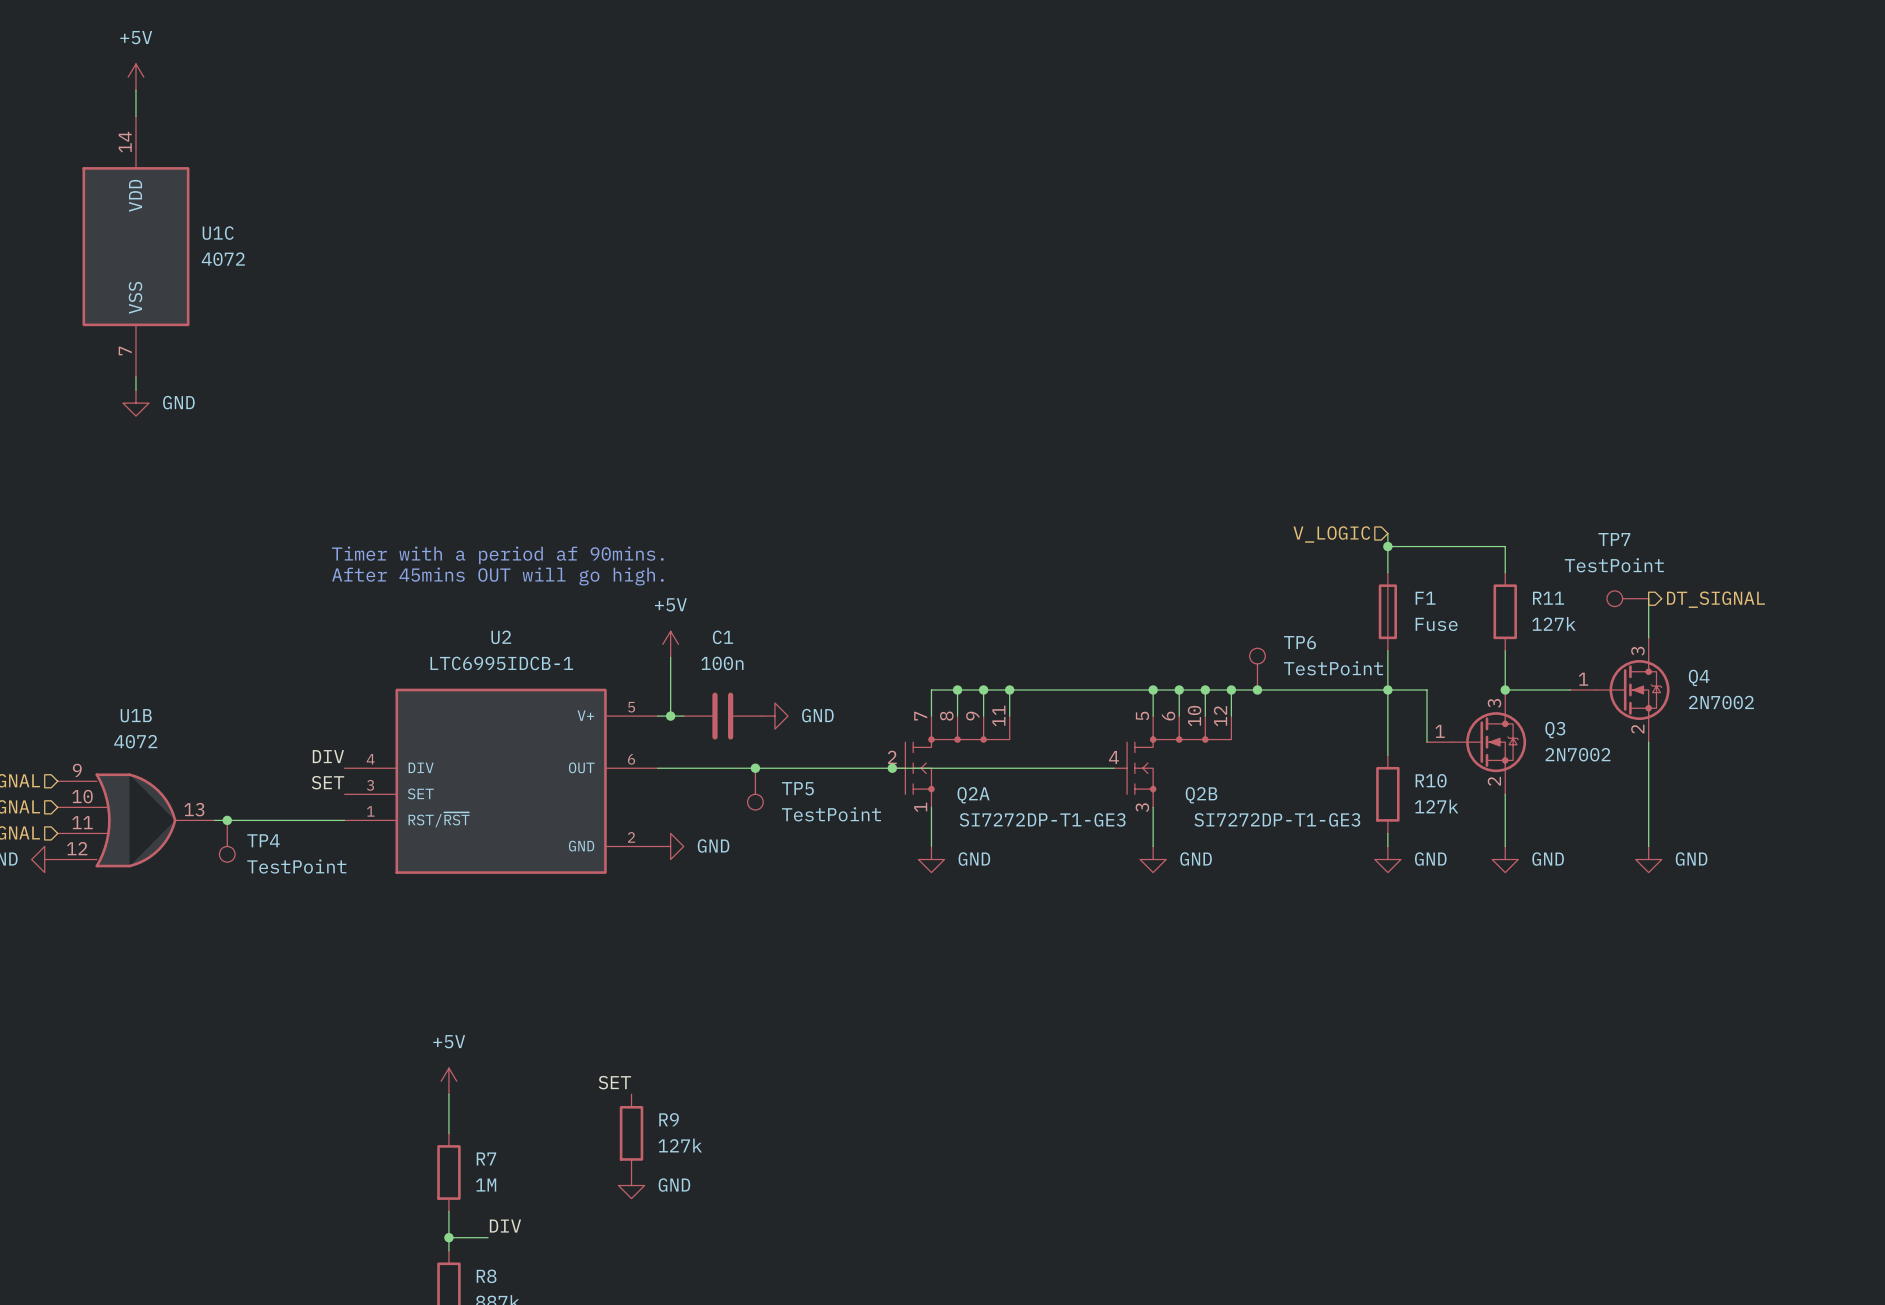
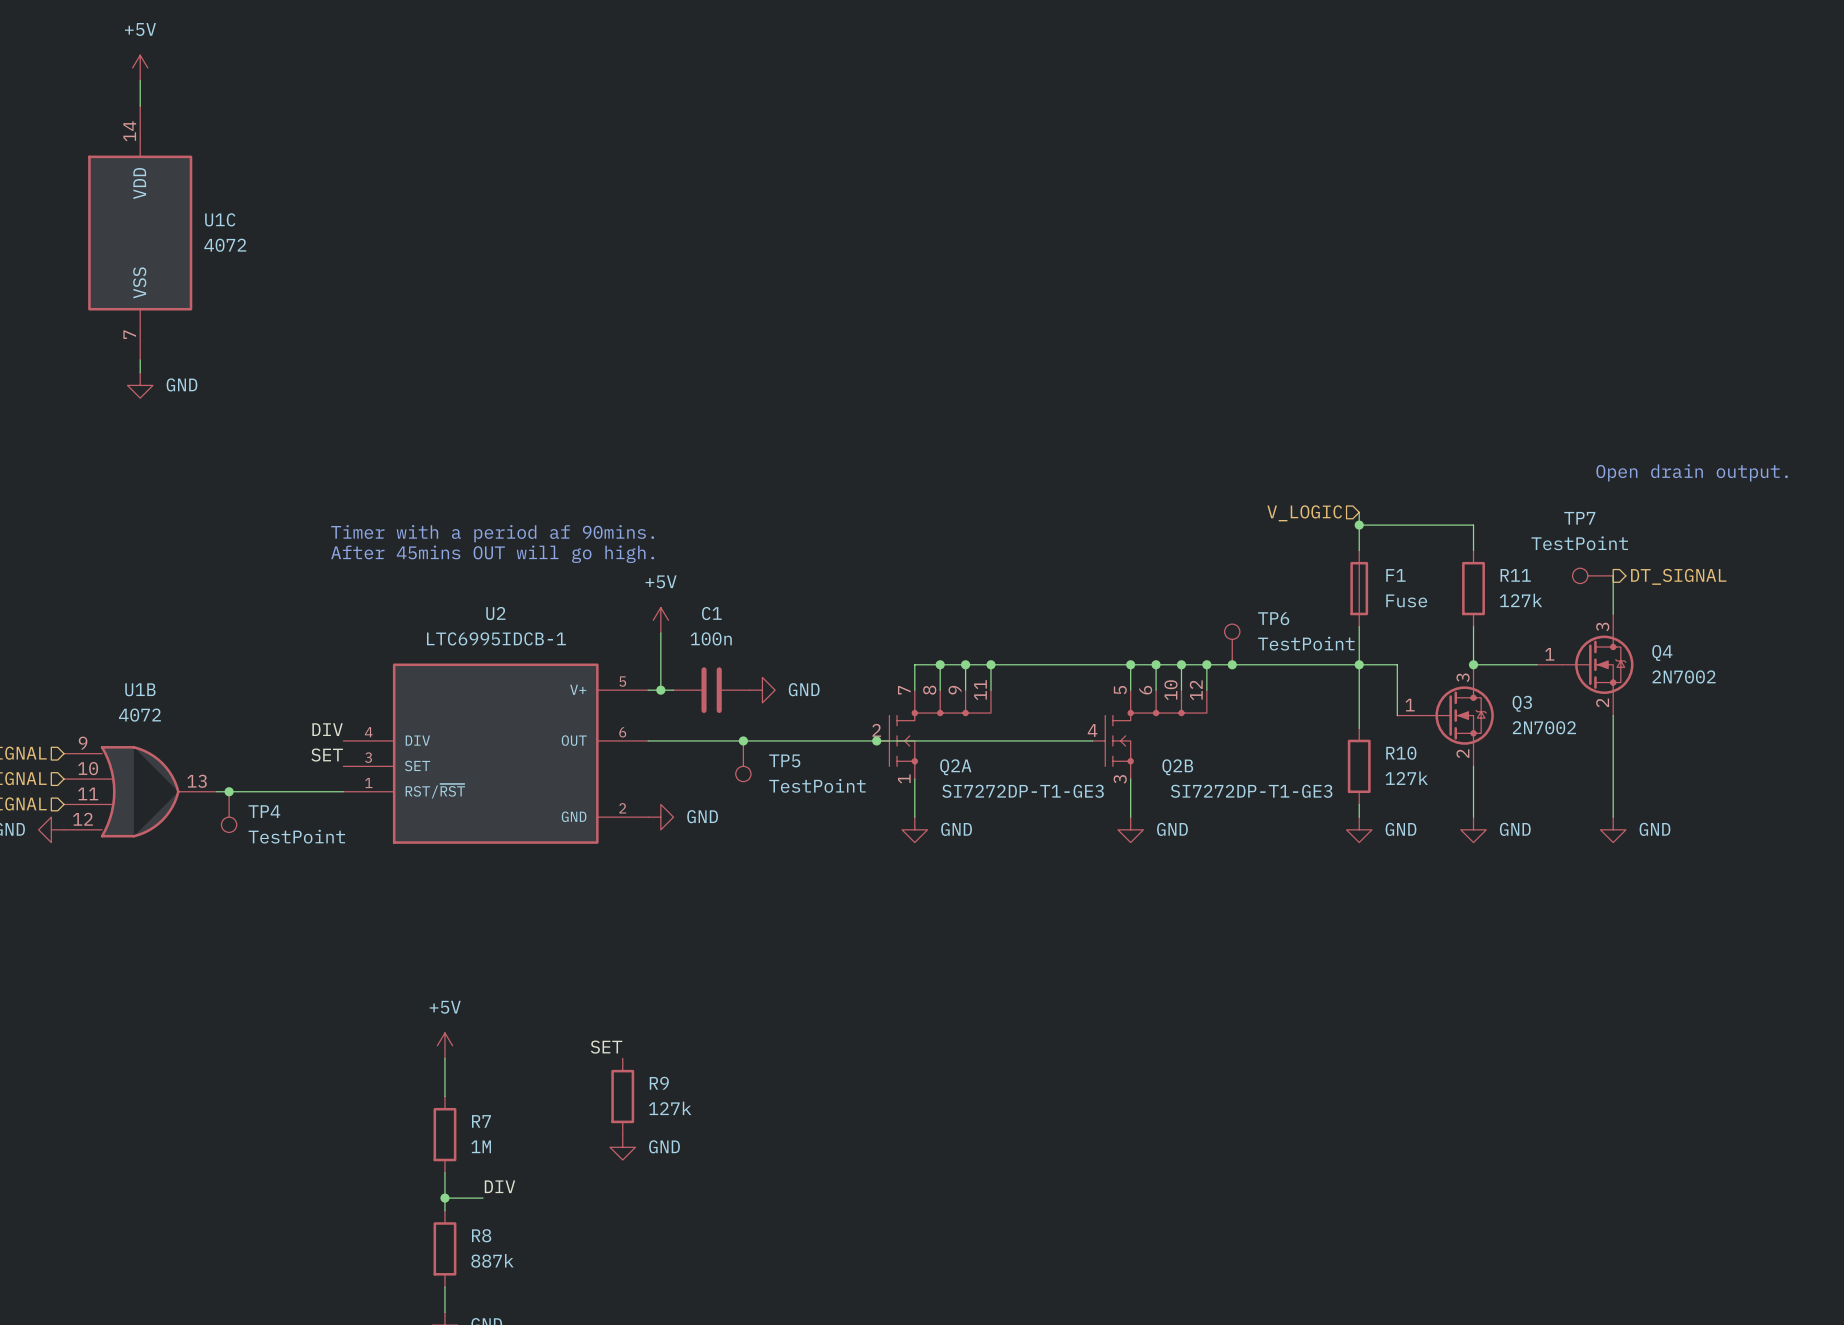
text: none -> Open drain output. (1692, 472)

